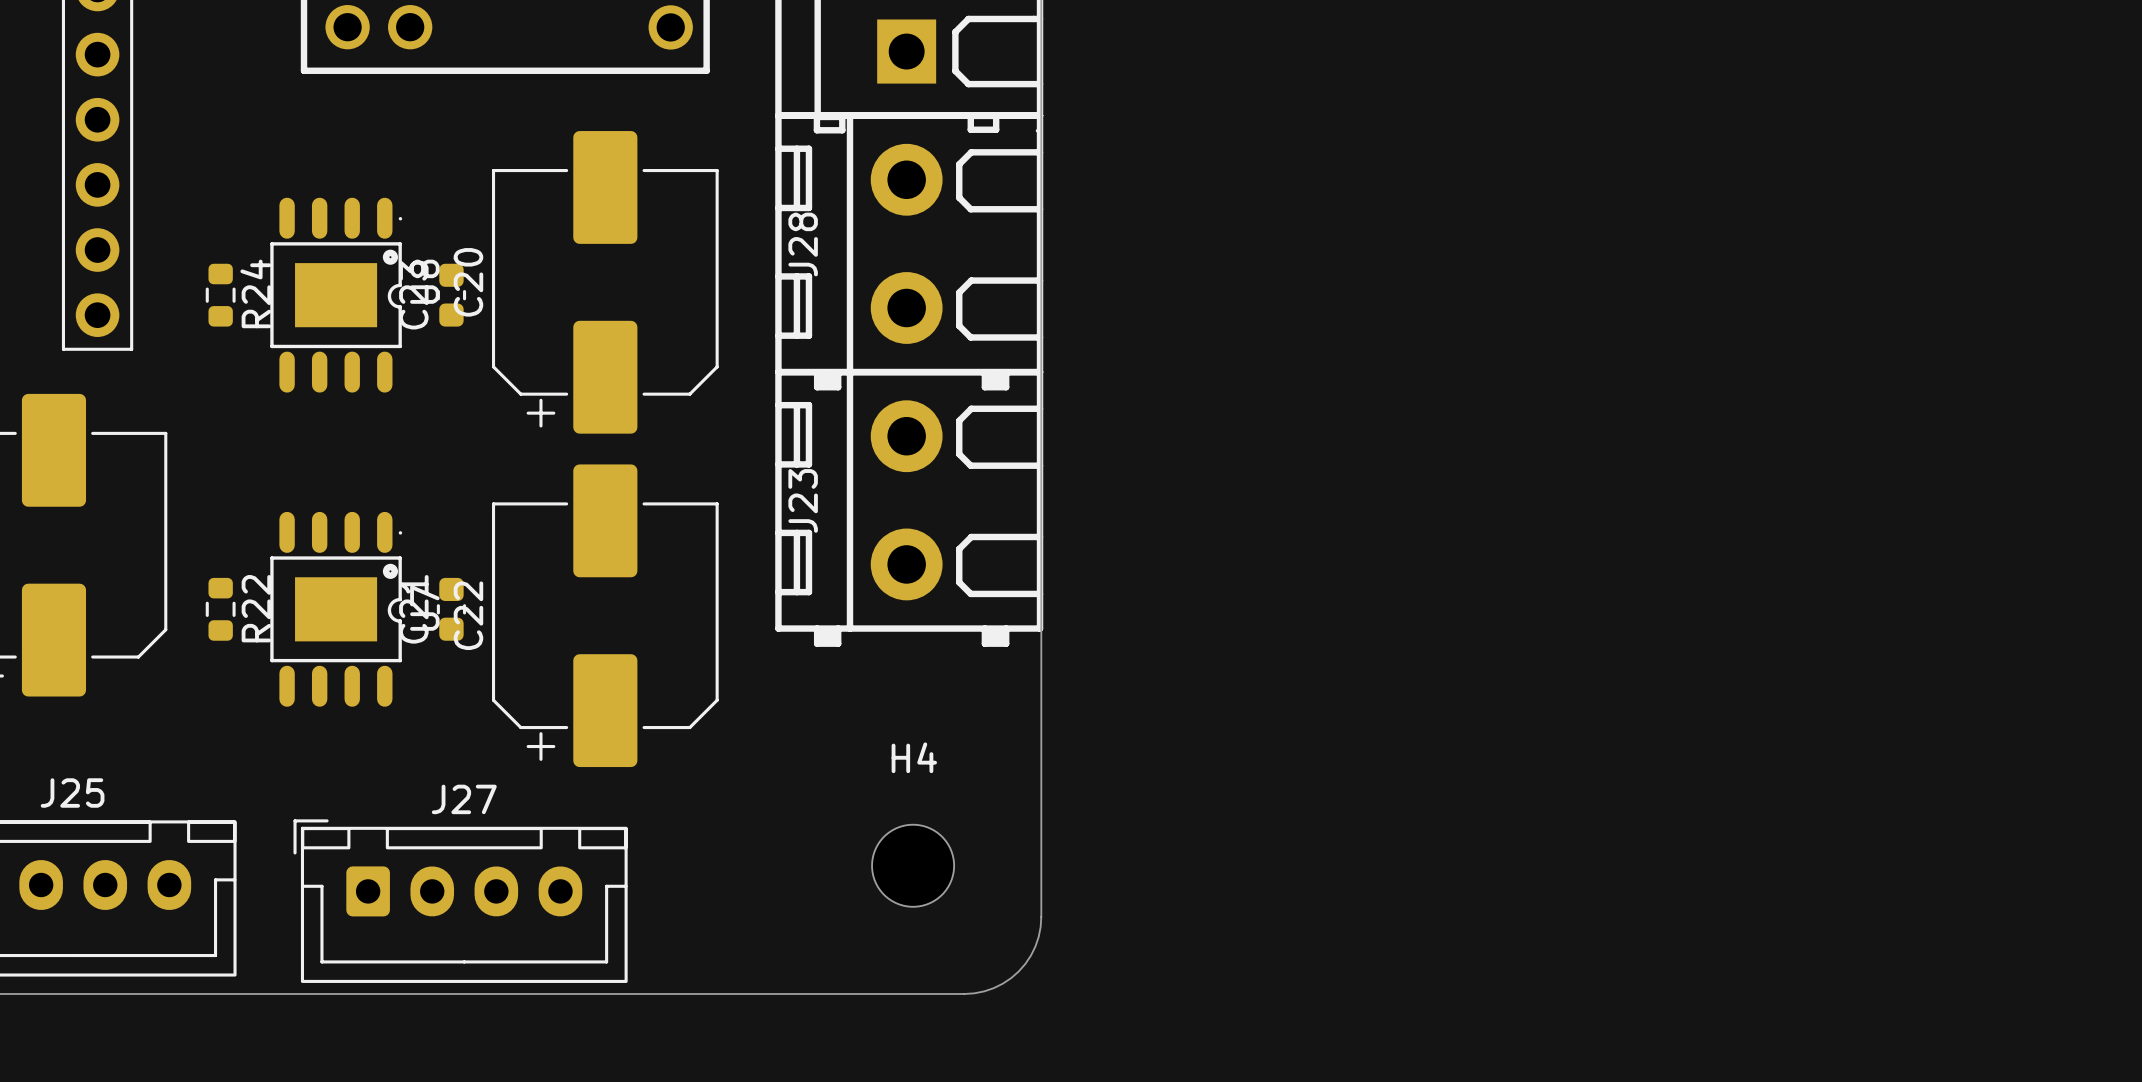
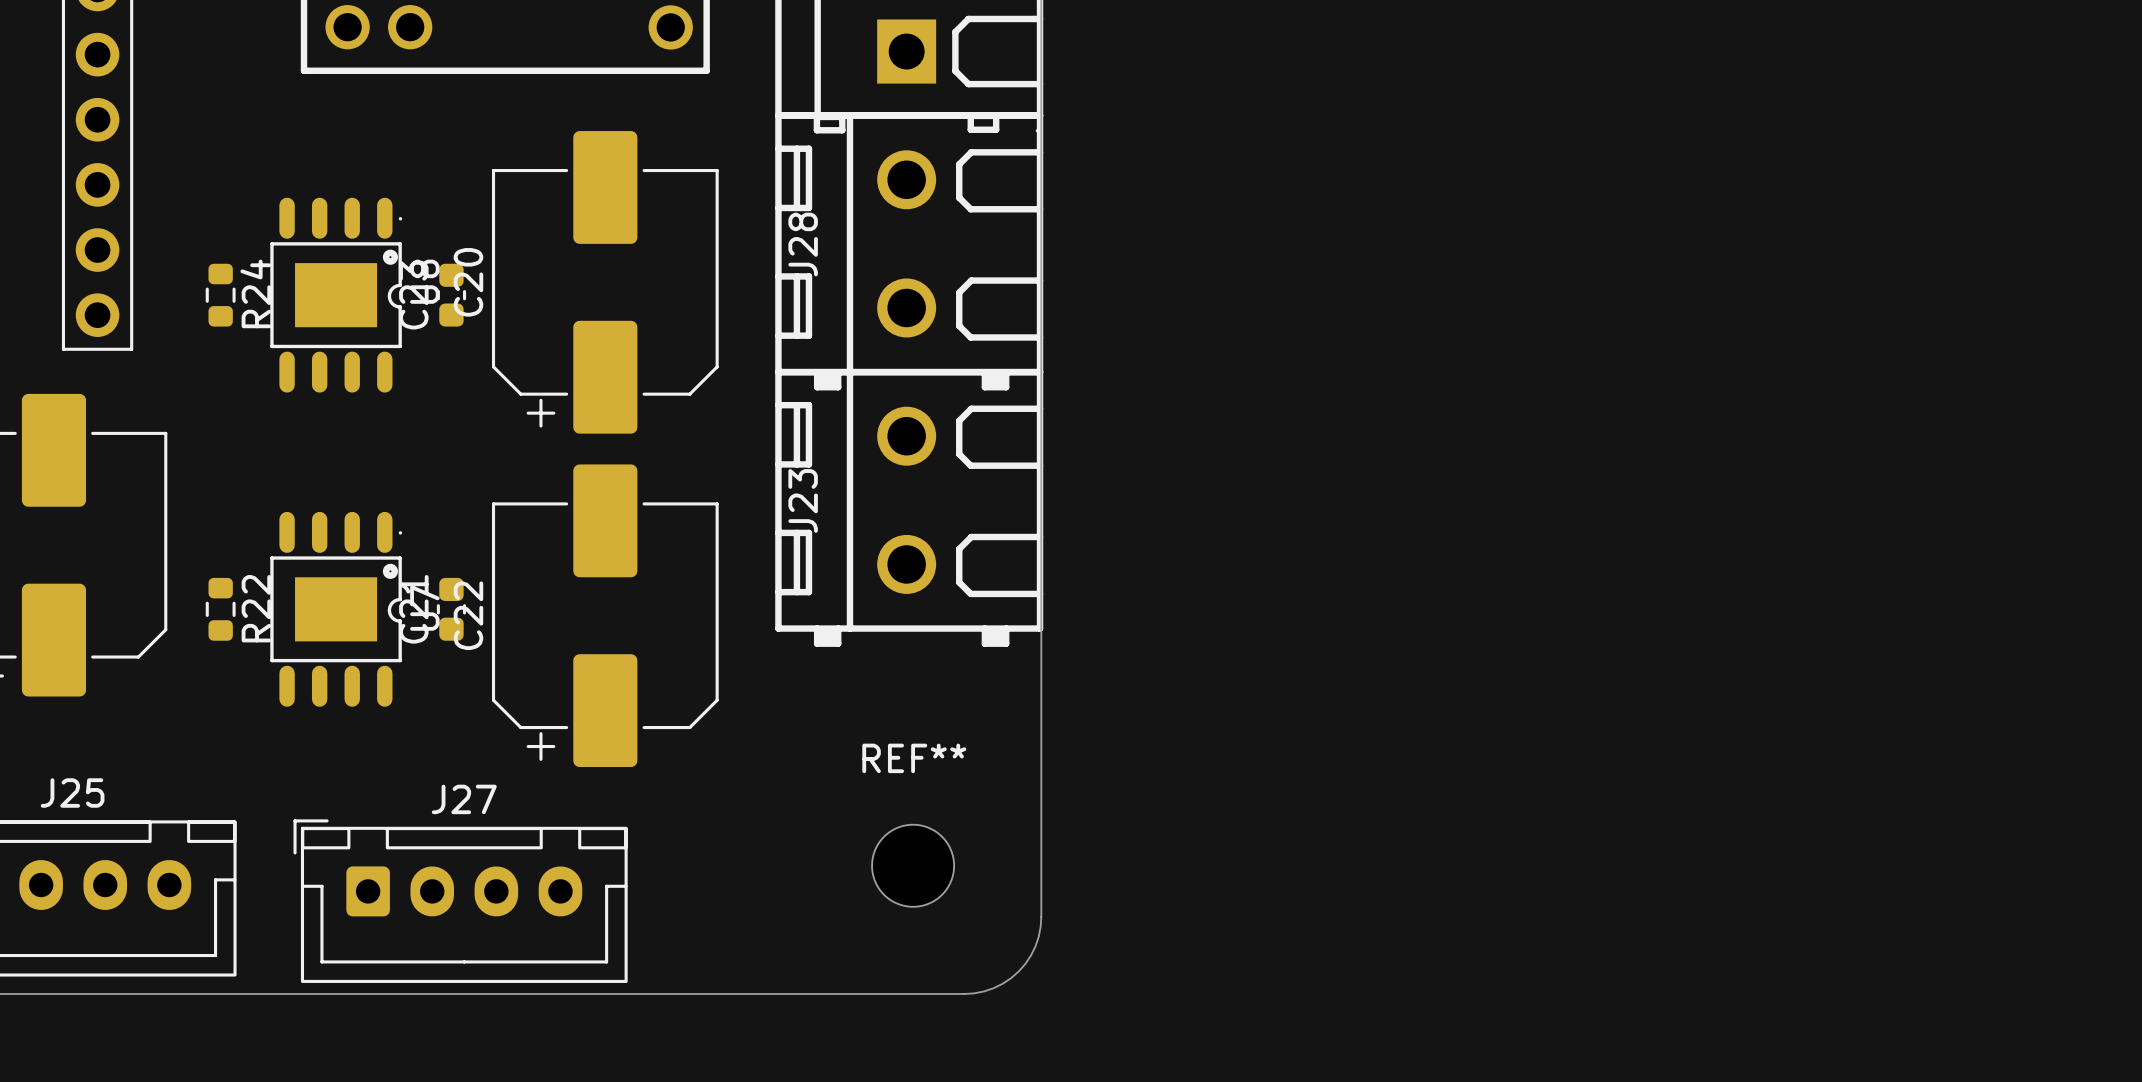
J28 footprint: [775, 112, 1044, 391] -> [775, 112, 1044, 391]
J23 footprint: [775, 368, 1044, 647] -> [775, 368, 1044, 647]
H4 name: H4 (914, 757) -> REF** (914, 758)

